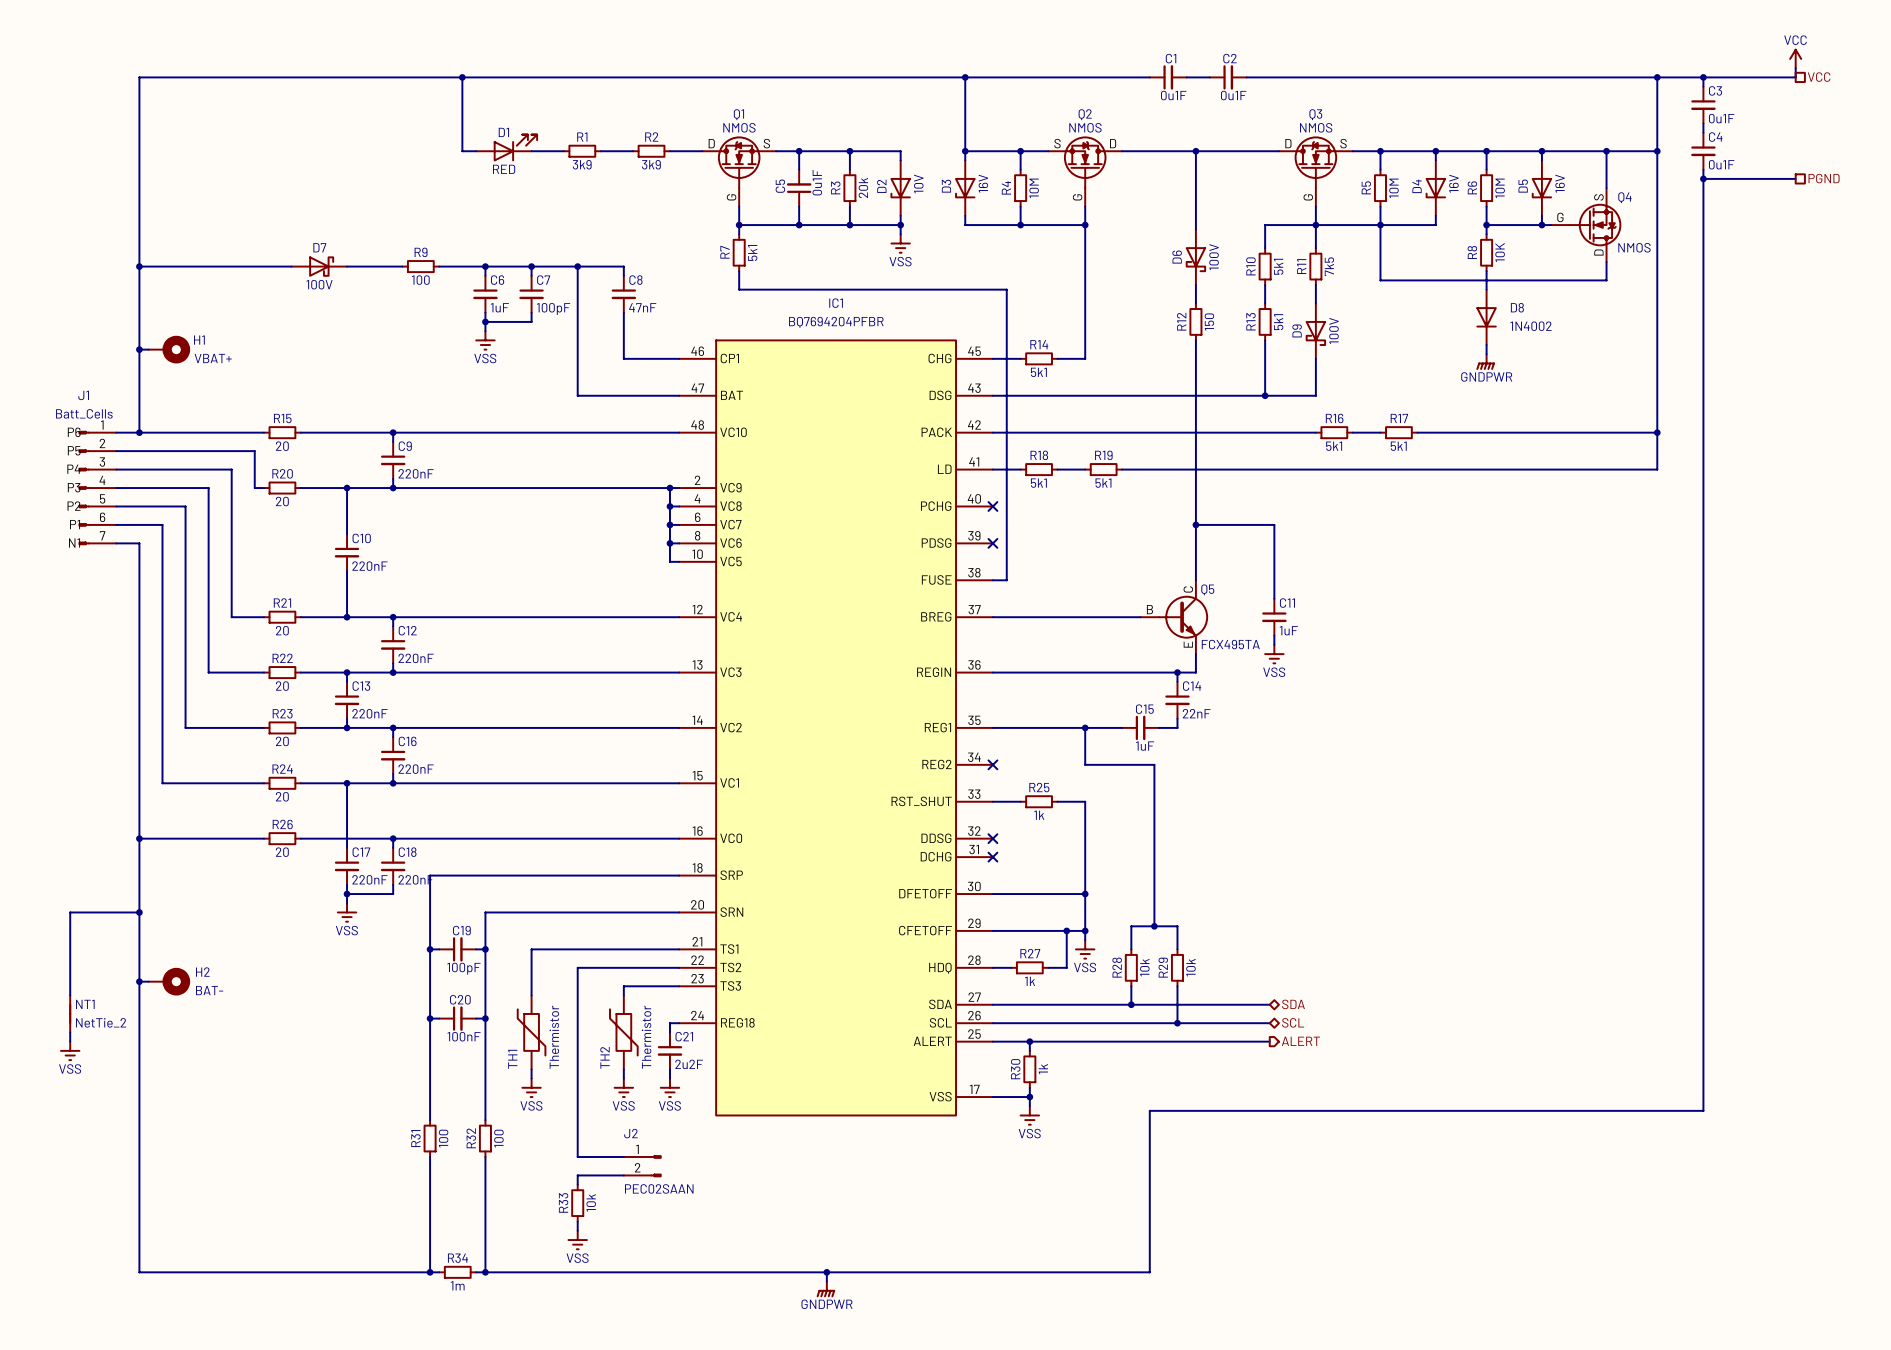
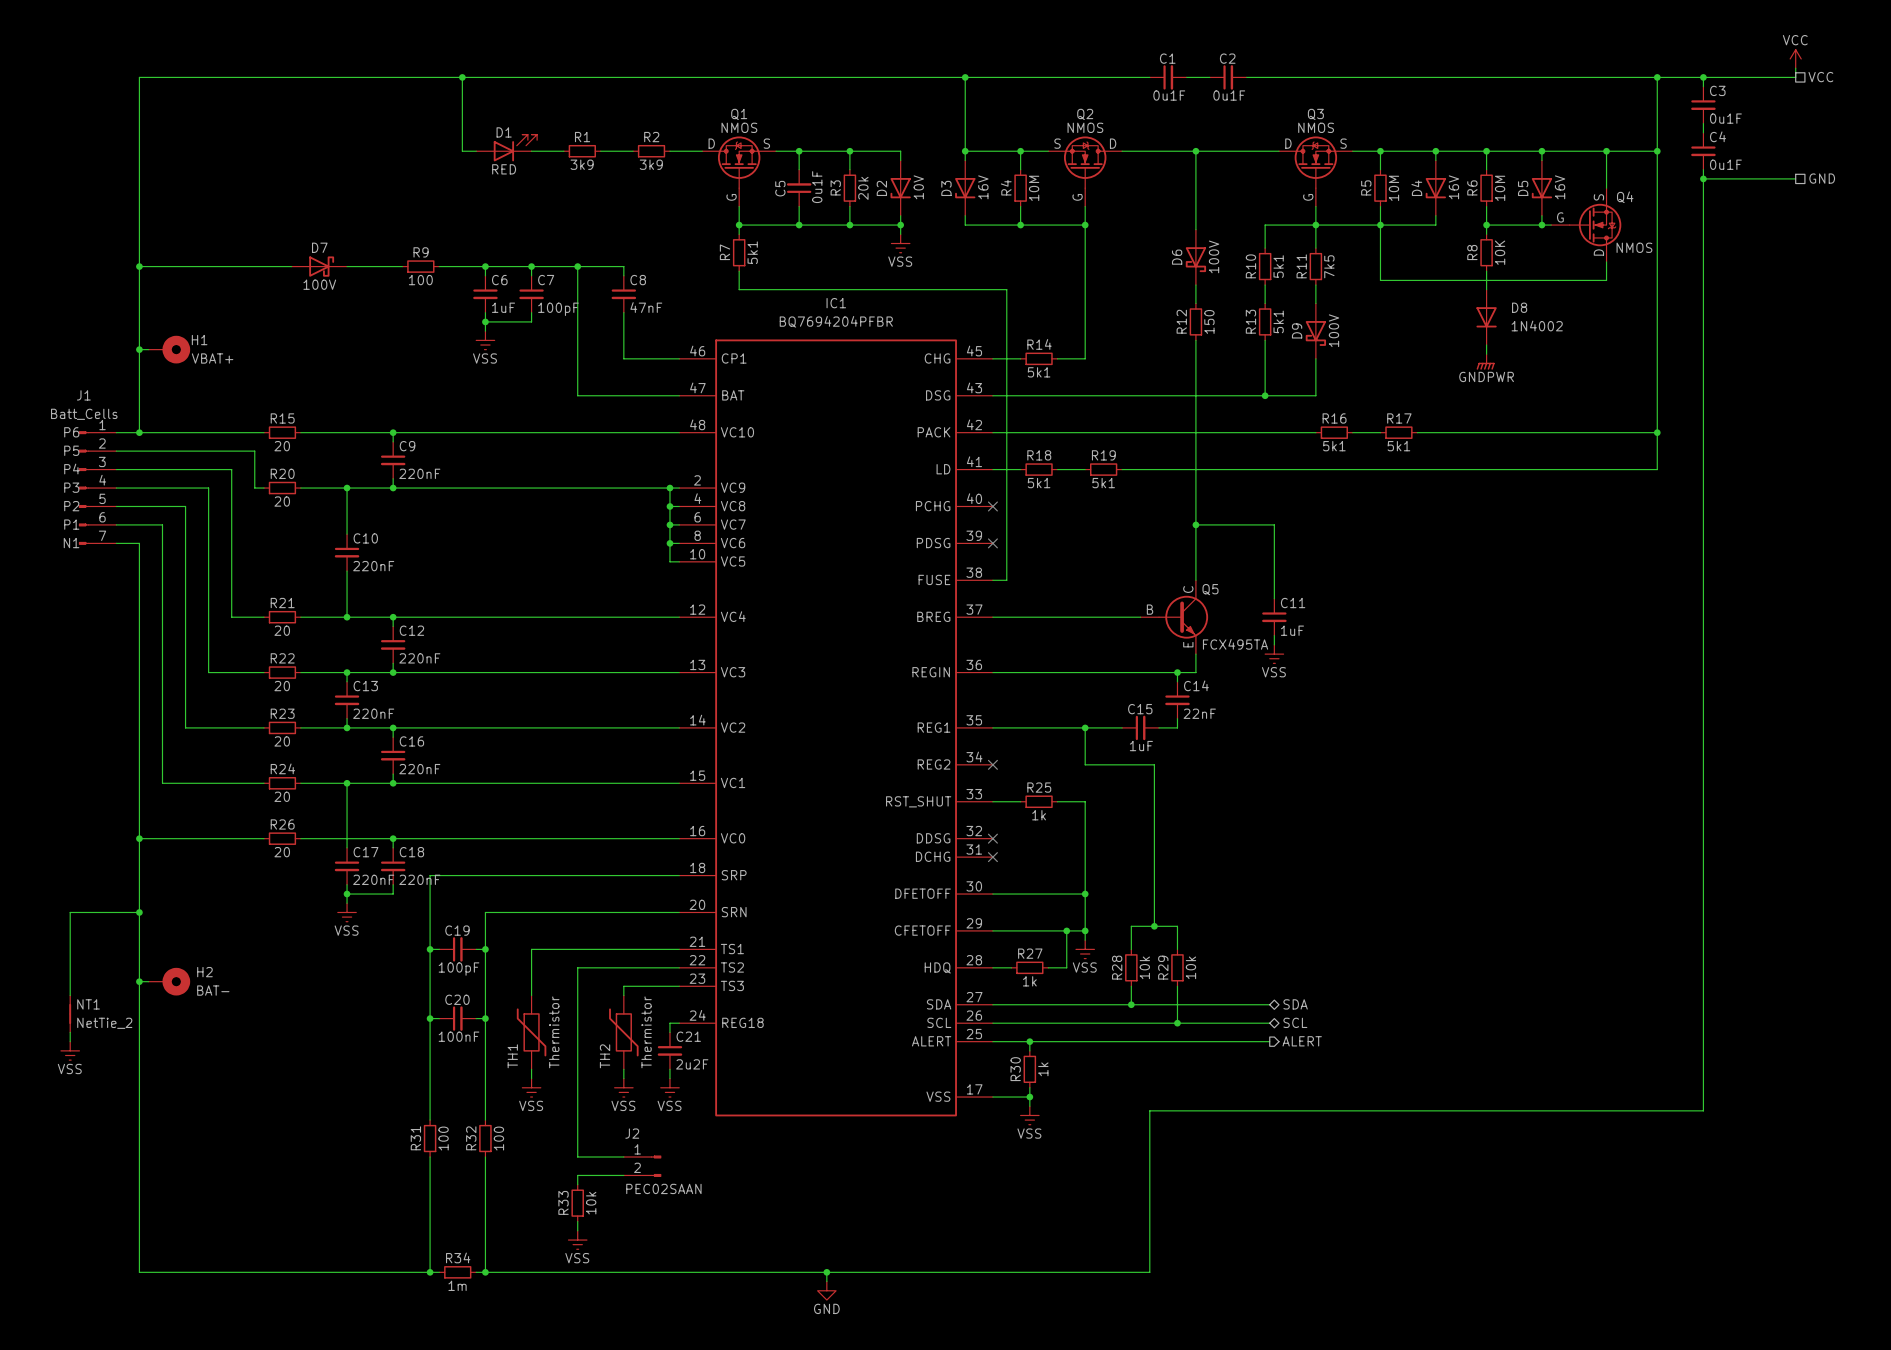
hierarchical label: PGND (1824, 178) -> GND (1822, 178)
power symbol: GNDPWR (825, 1289) -> GND (826, 1290)

